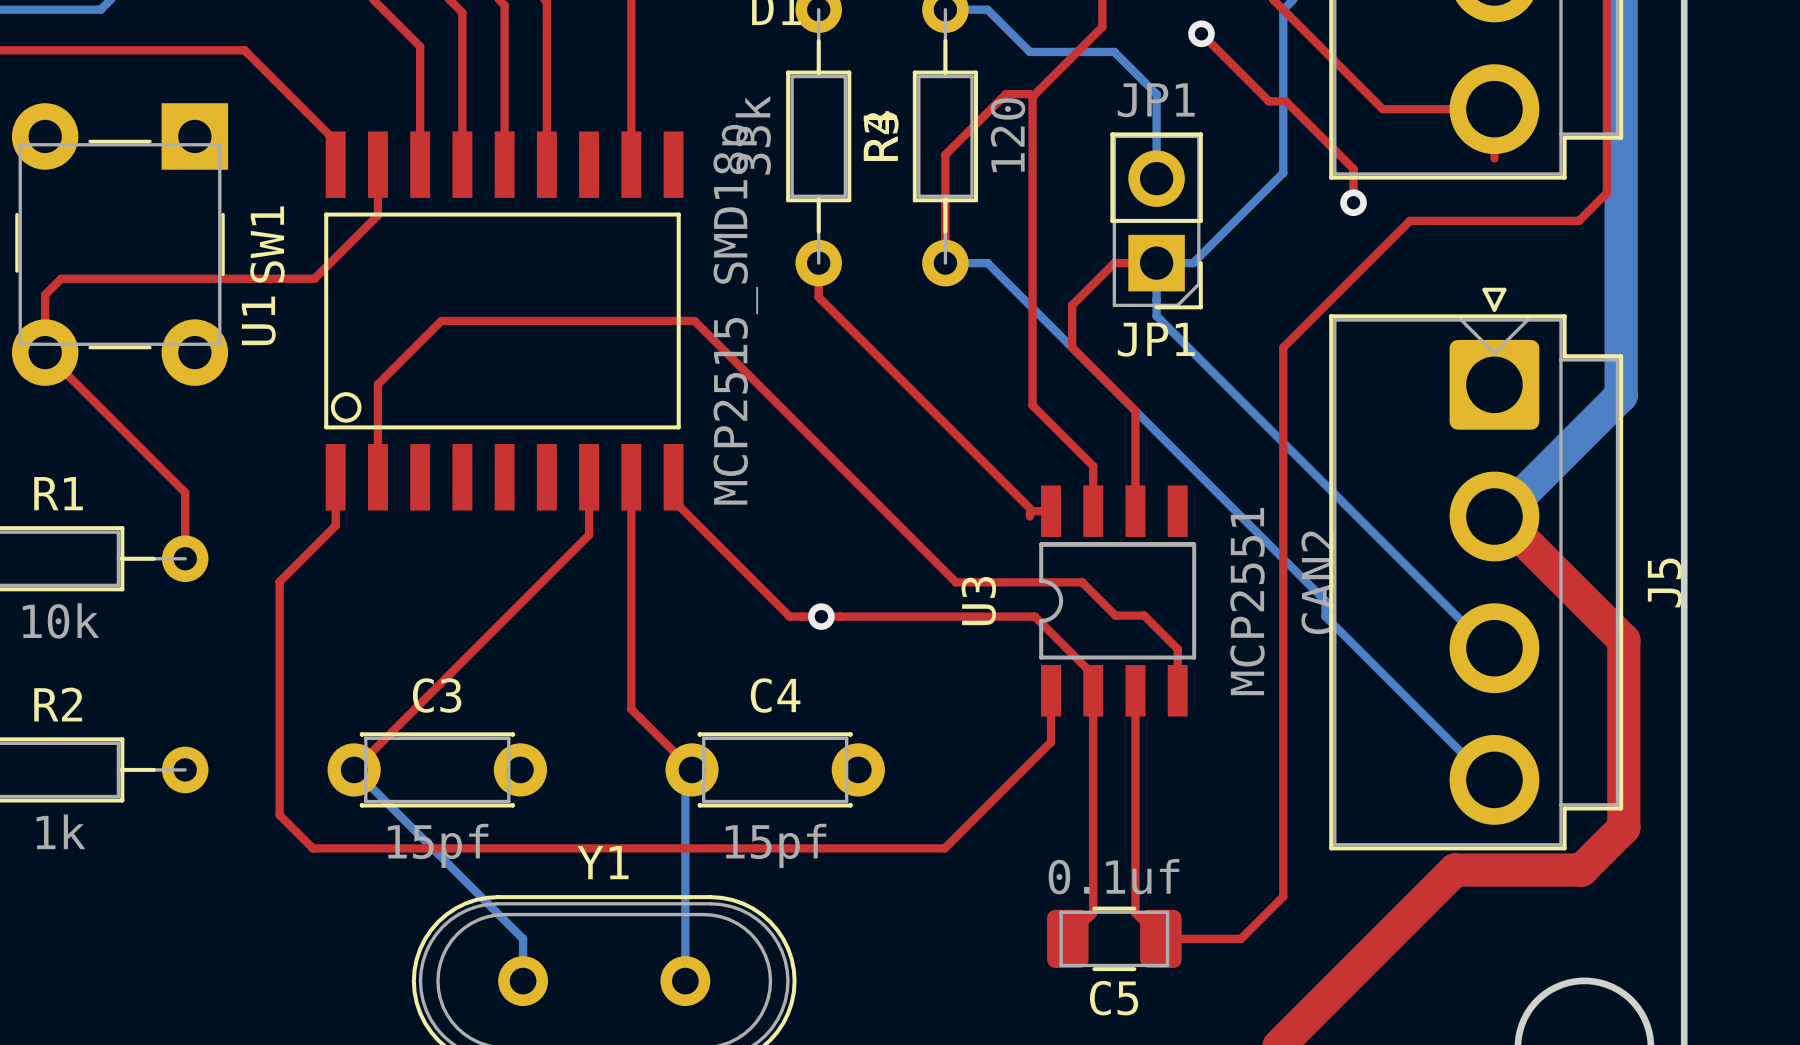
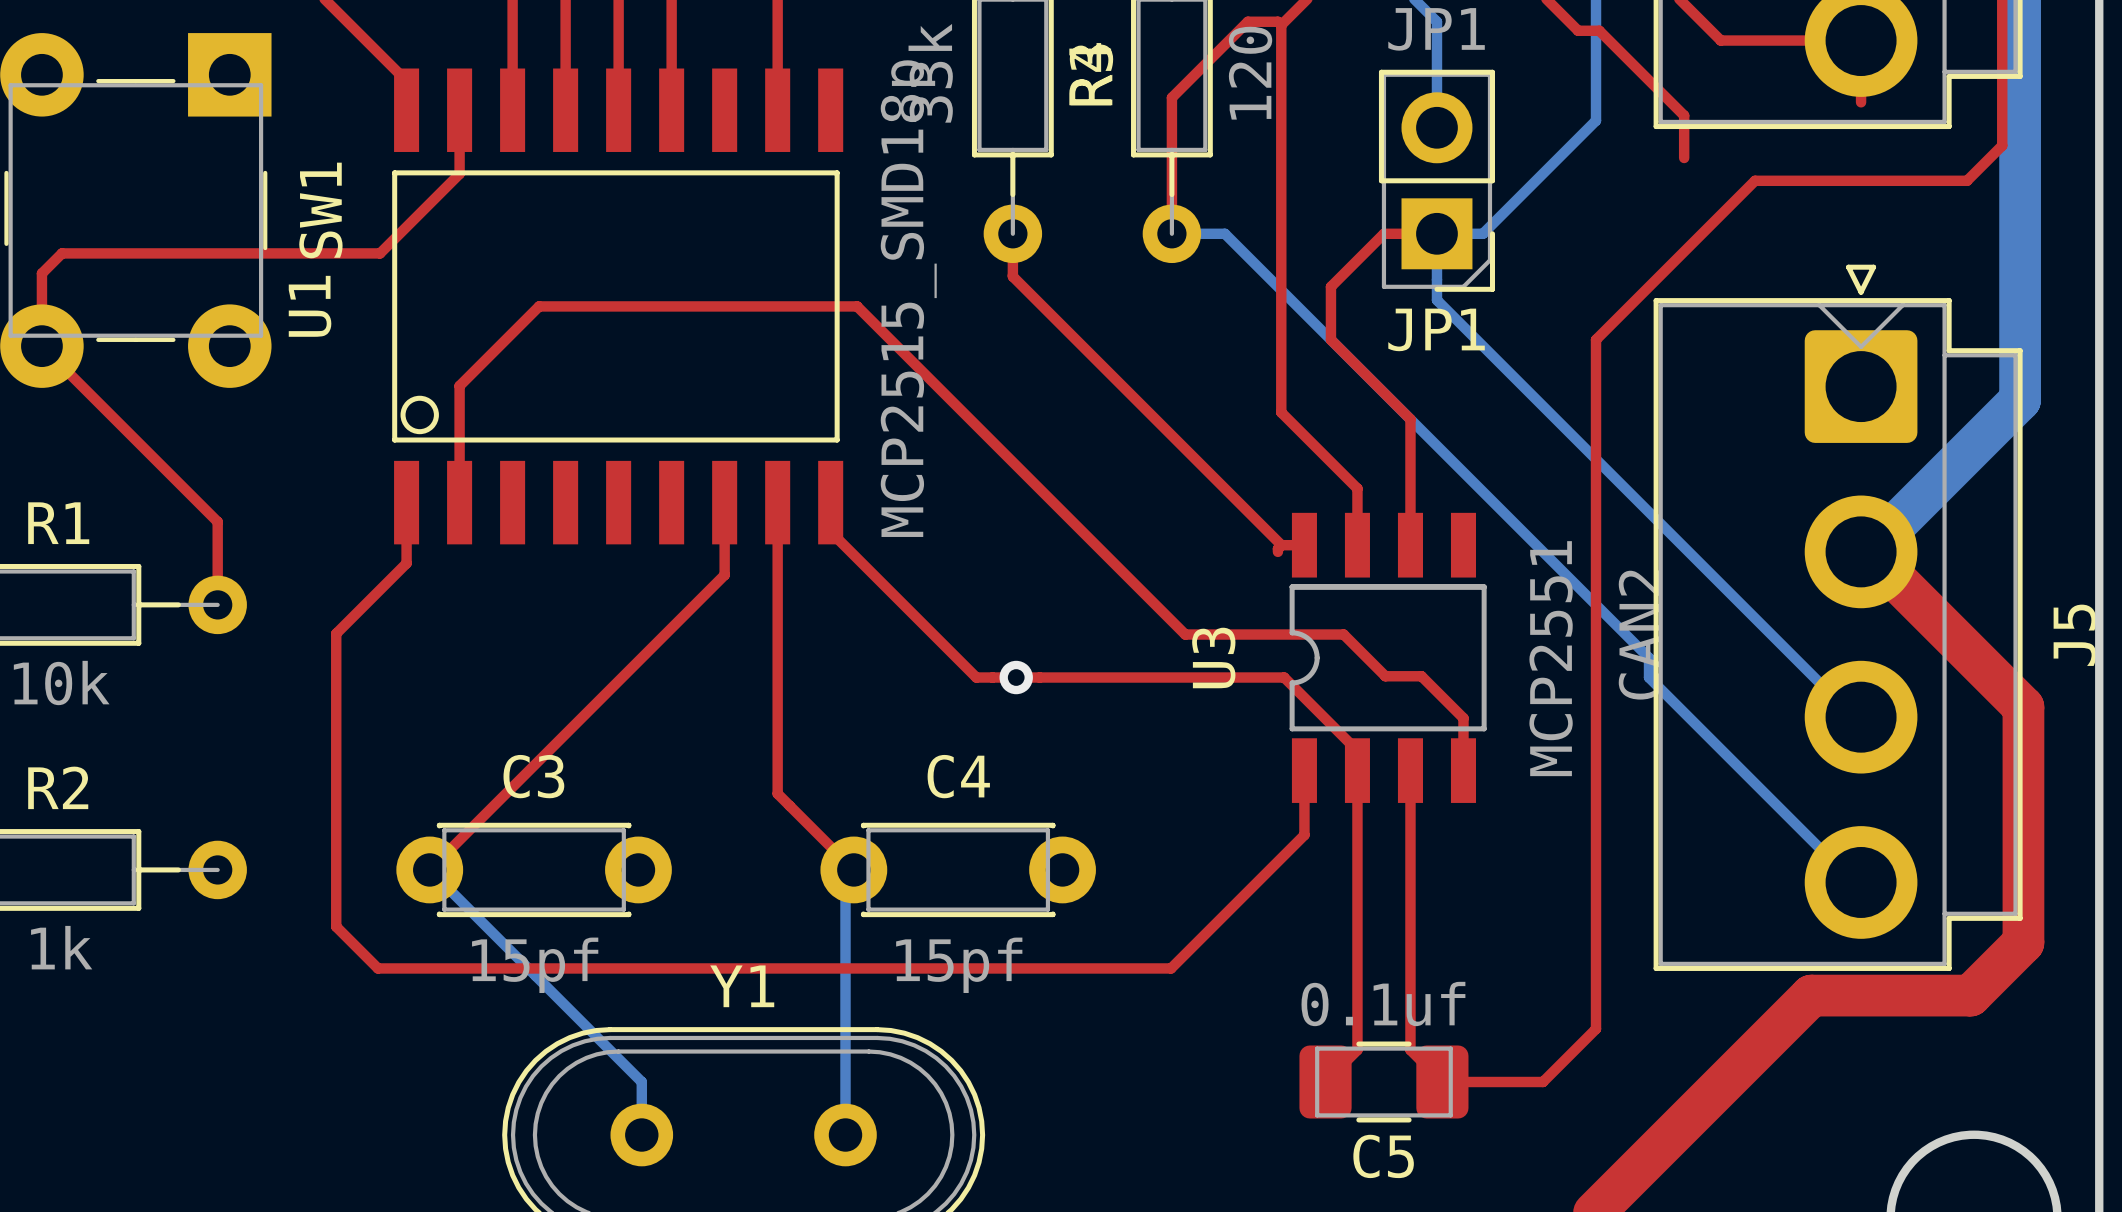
via: (1353, 202) -> none

